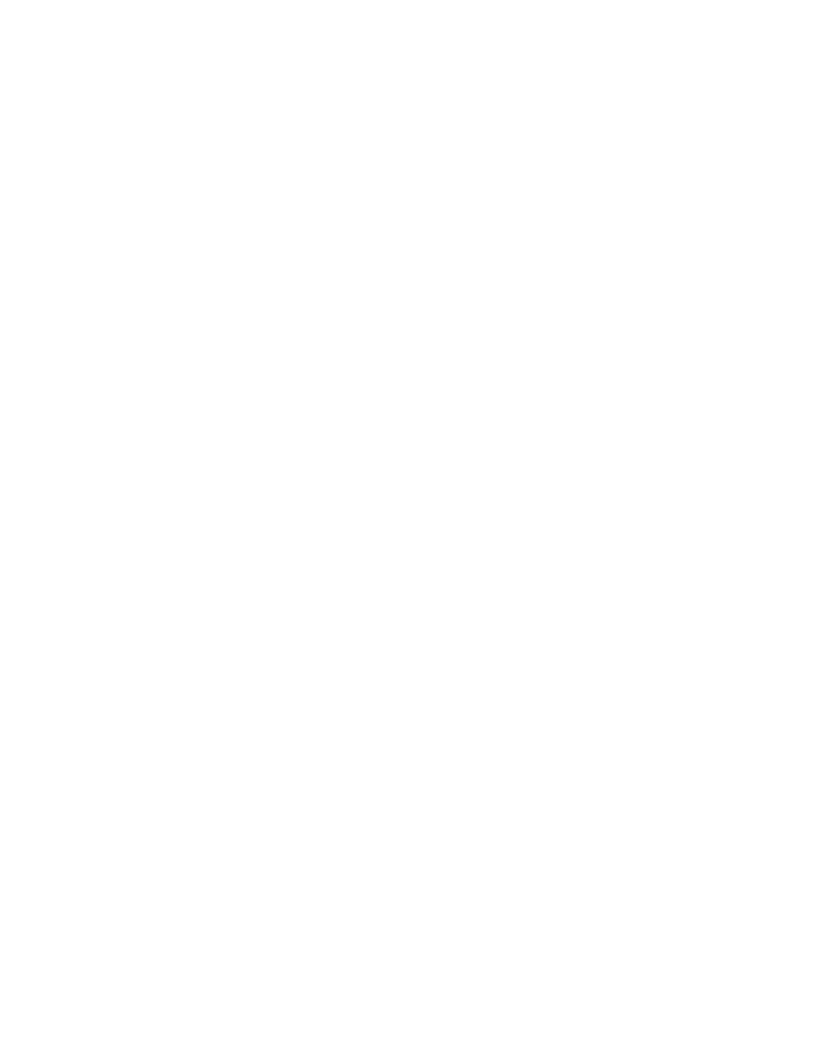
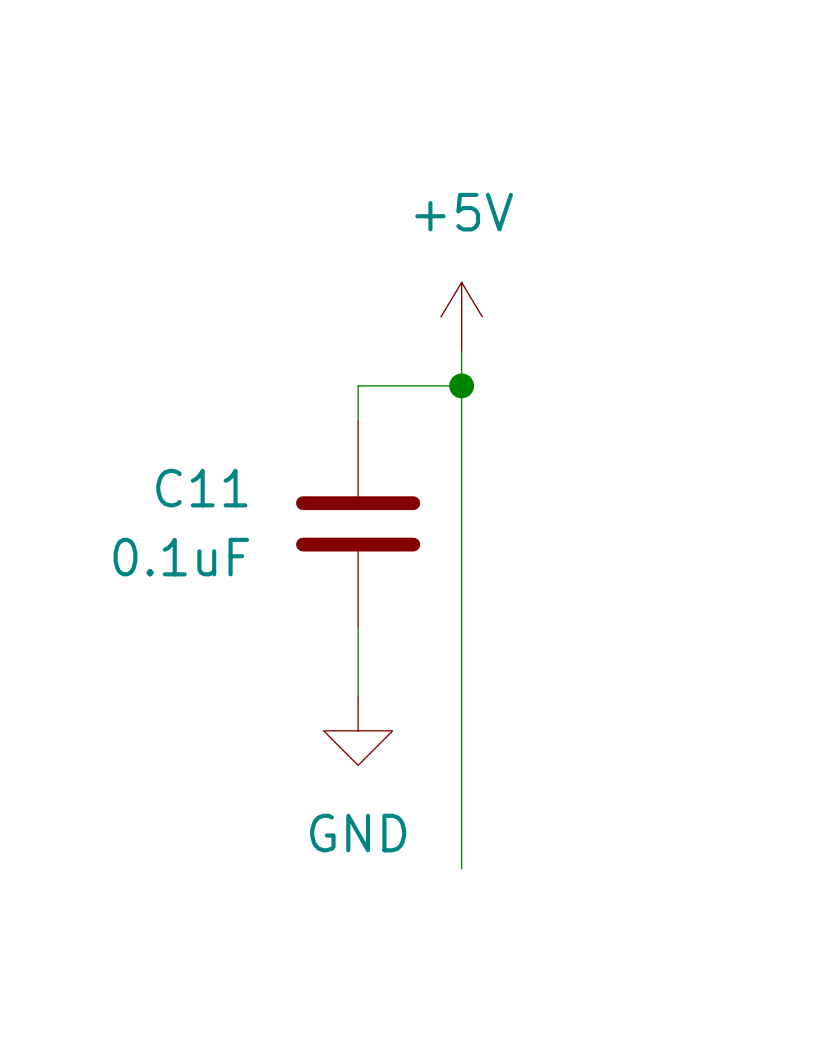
power symbol: none -> +5V (461, 316)
wire: none -> (461, 351) (461, 868)
wire: none -> (461, 385) (358, 385) (358, 420)
junction: none -> (461, 385)
C11: none -> 0.1uF (358, 523)
wire: none -> (358, 627) (358, 696)
power symbol: none -> GND (358, 730)

